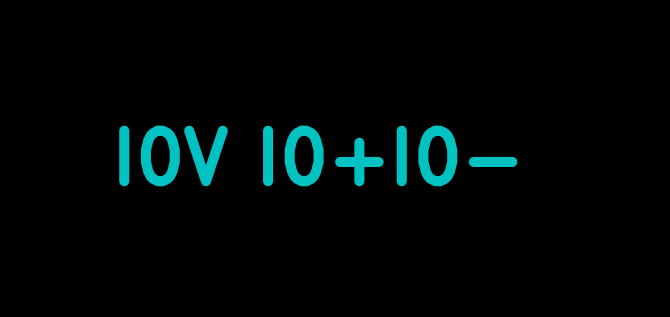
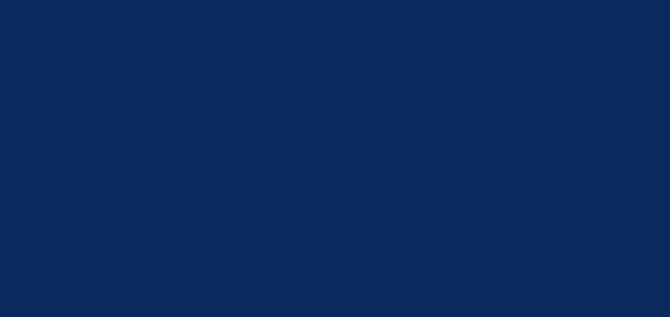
text: I0V (173, 155) -> none
text: I0+ (323, 155) -> none
text: I0- (457, 155) -> none

